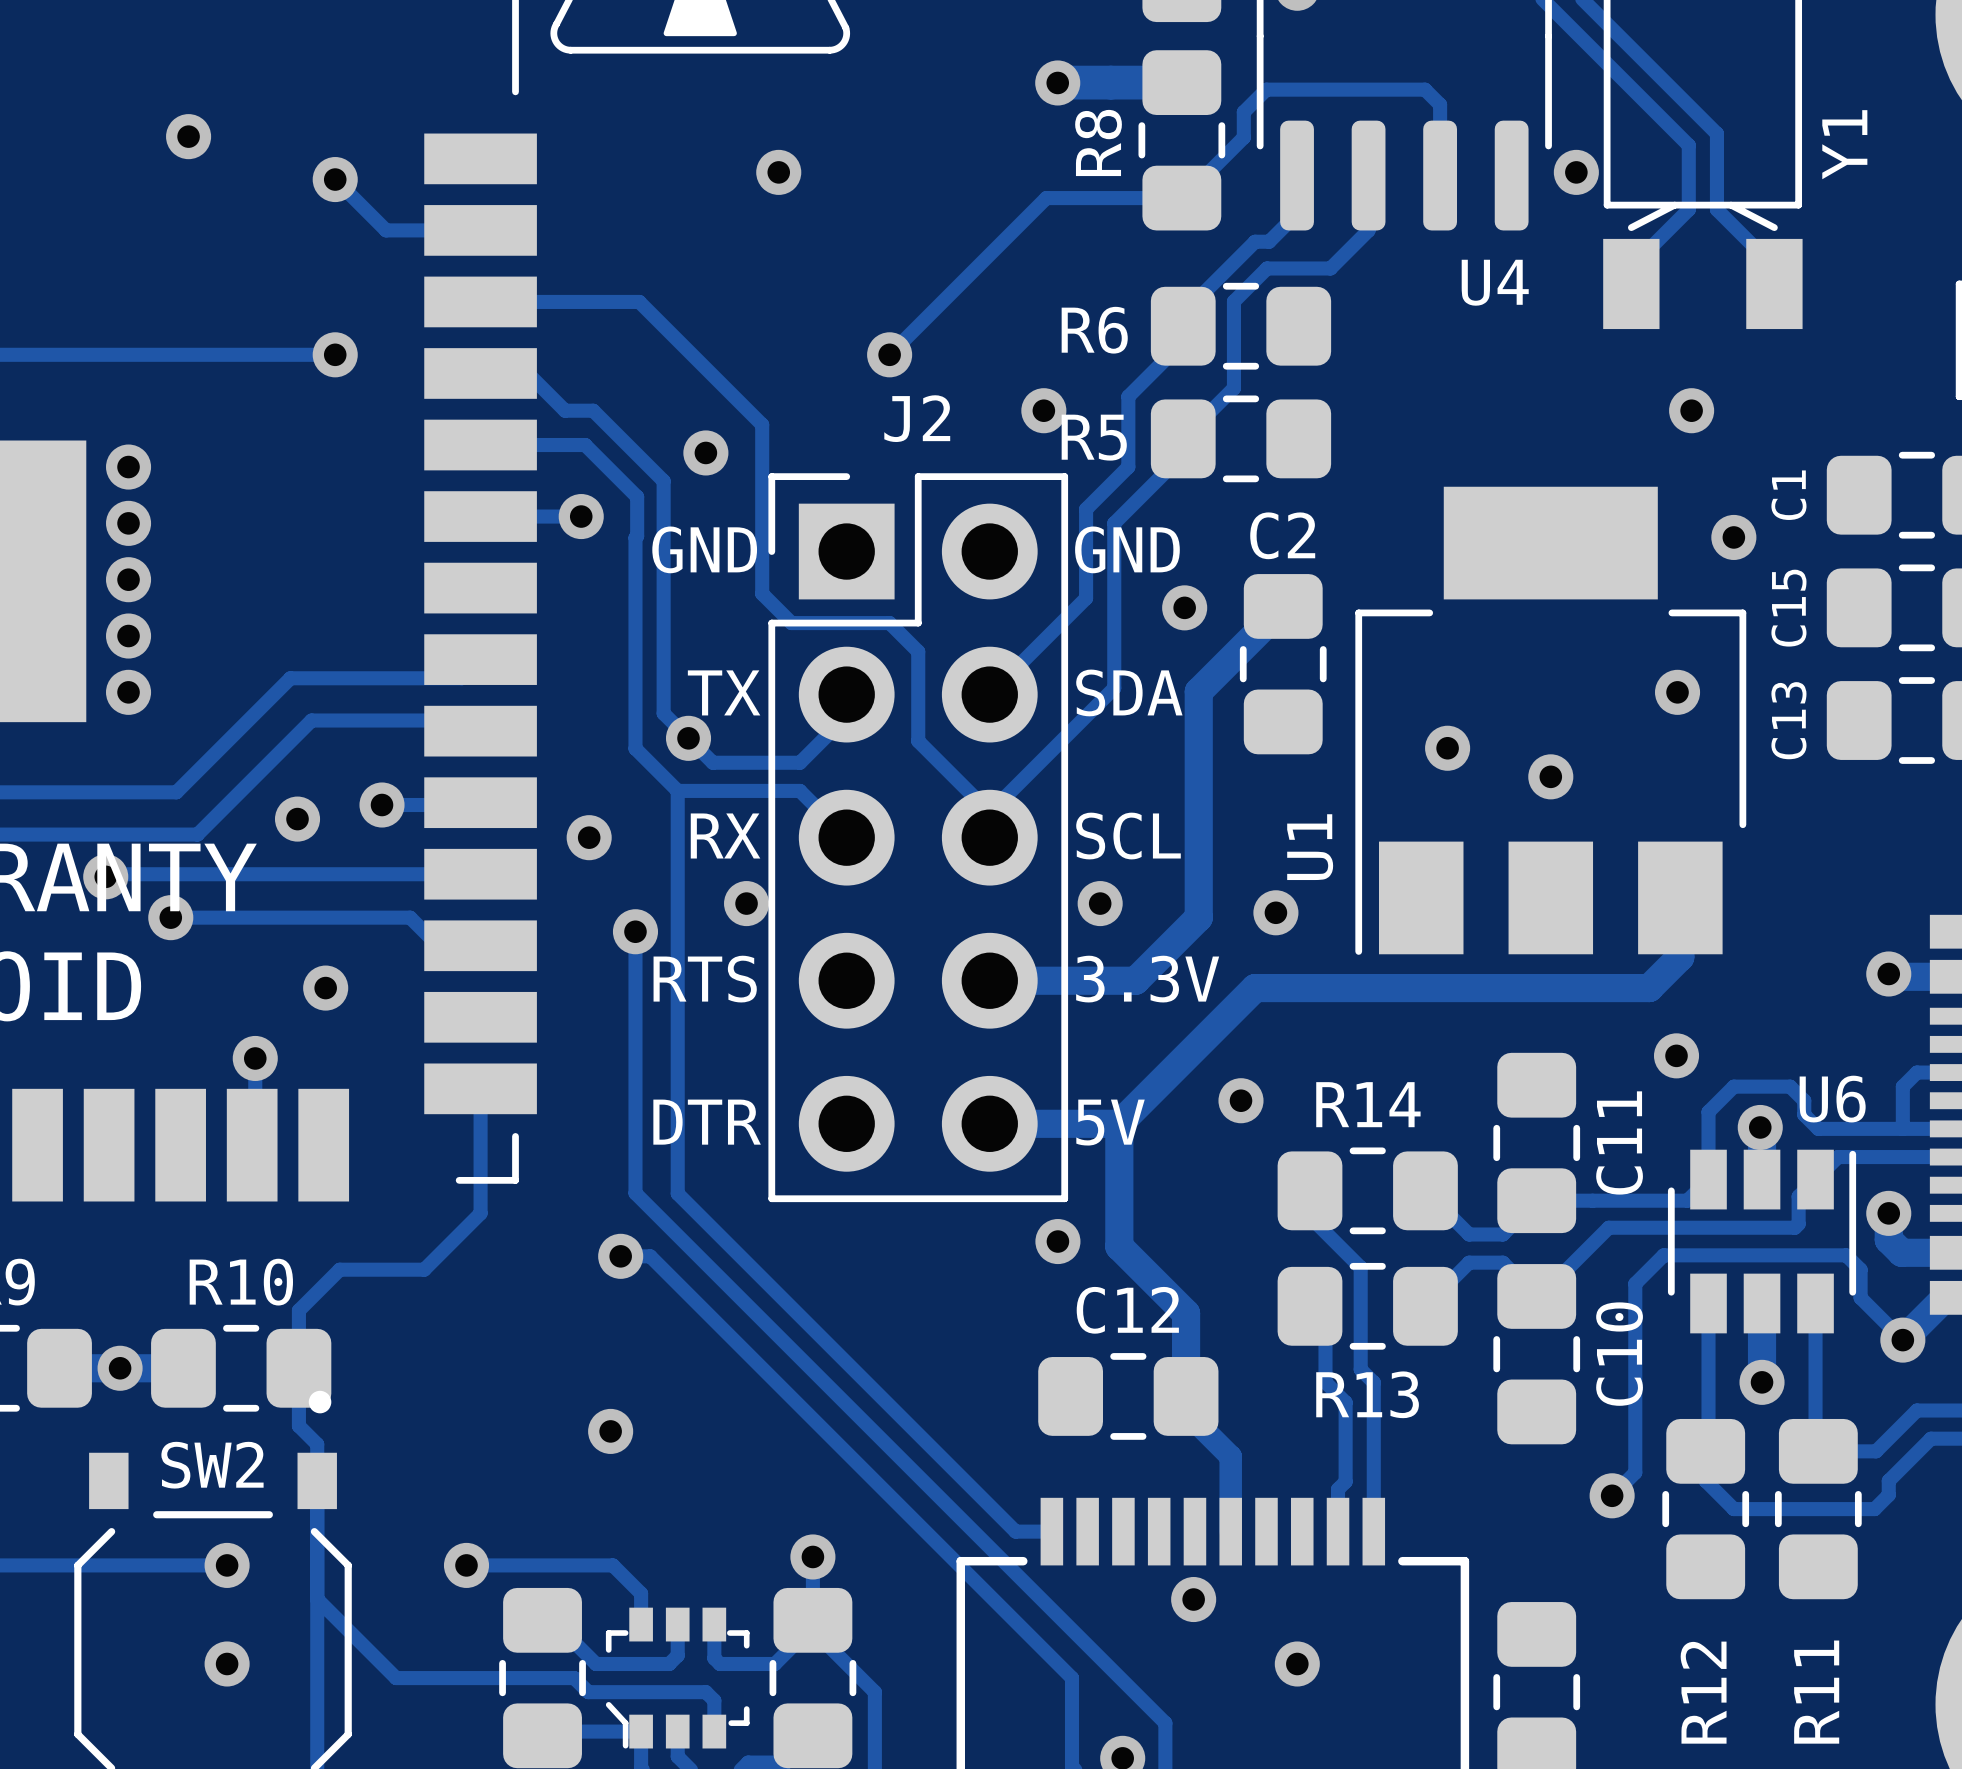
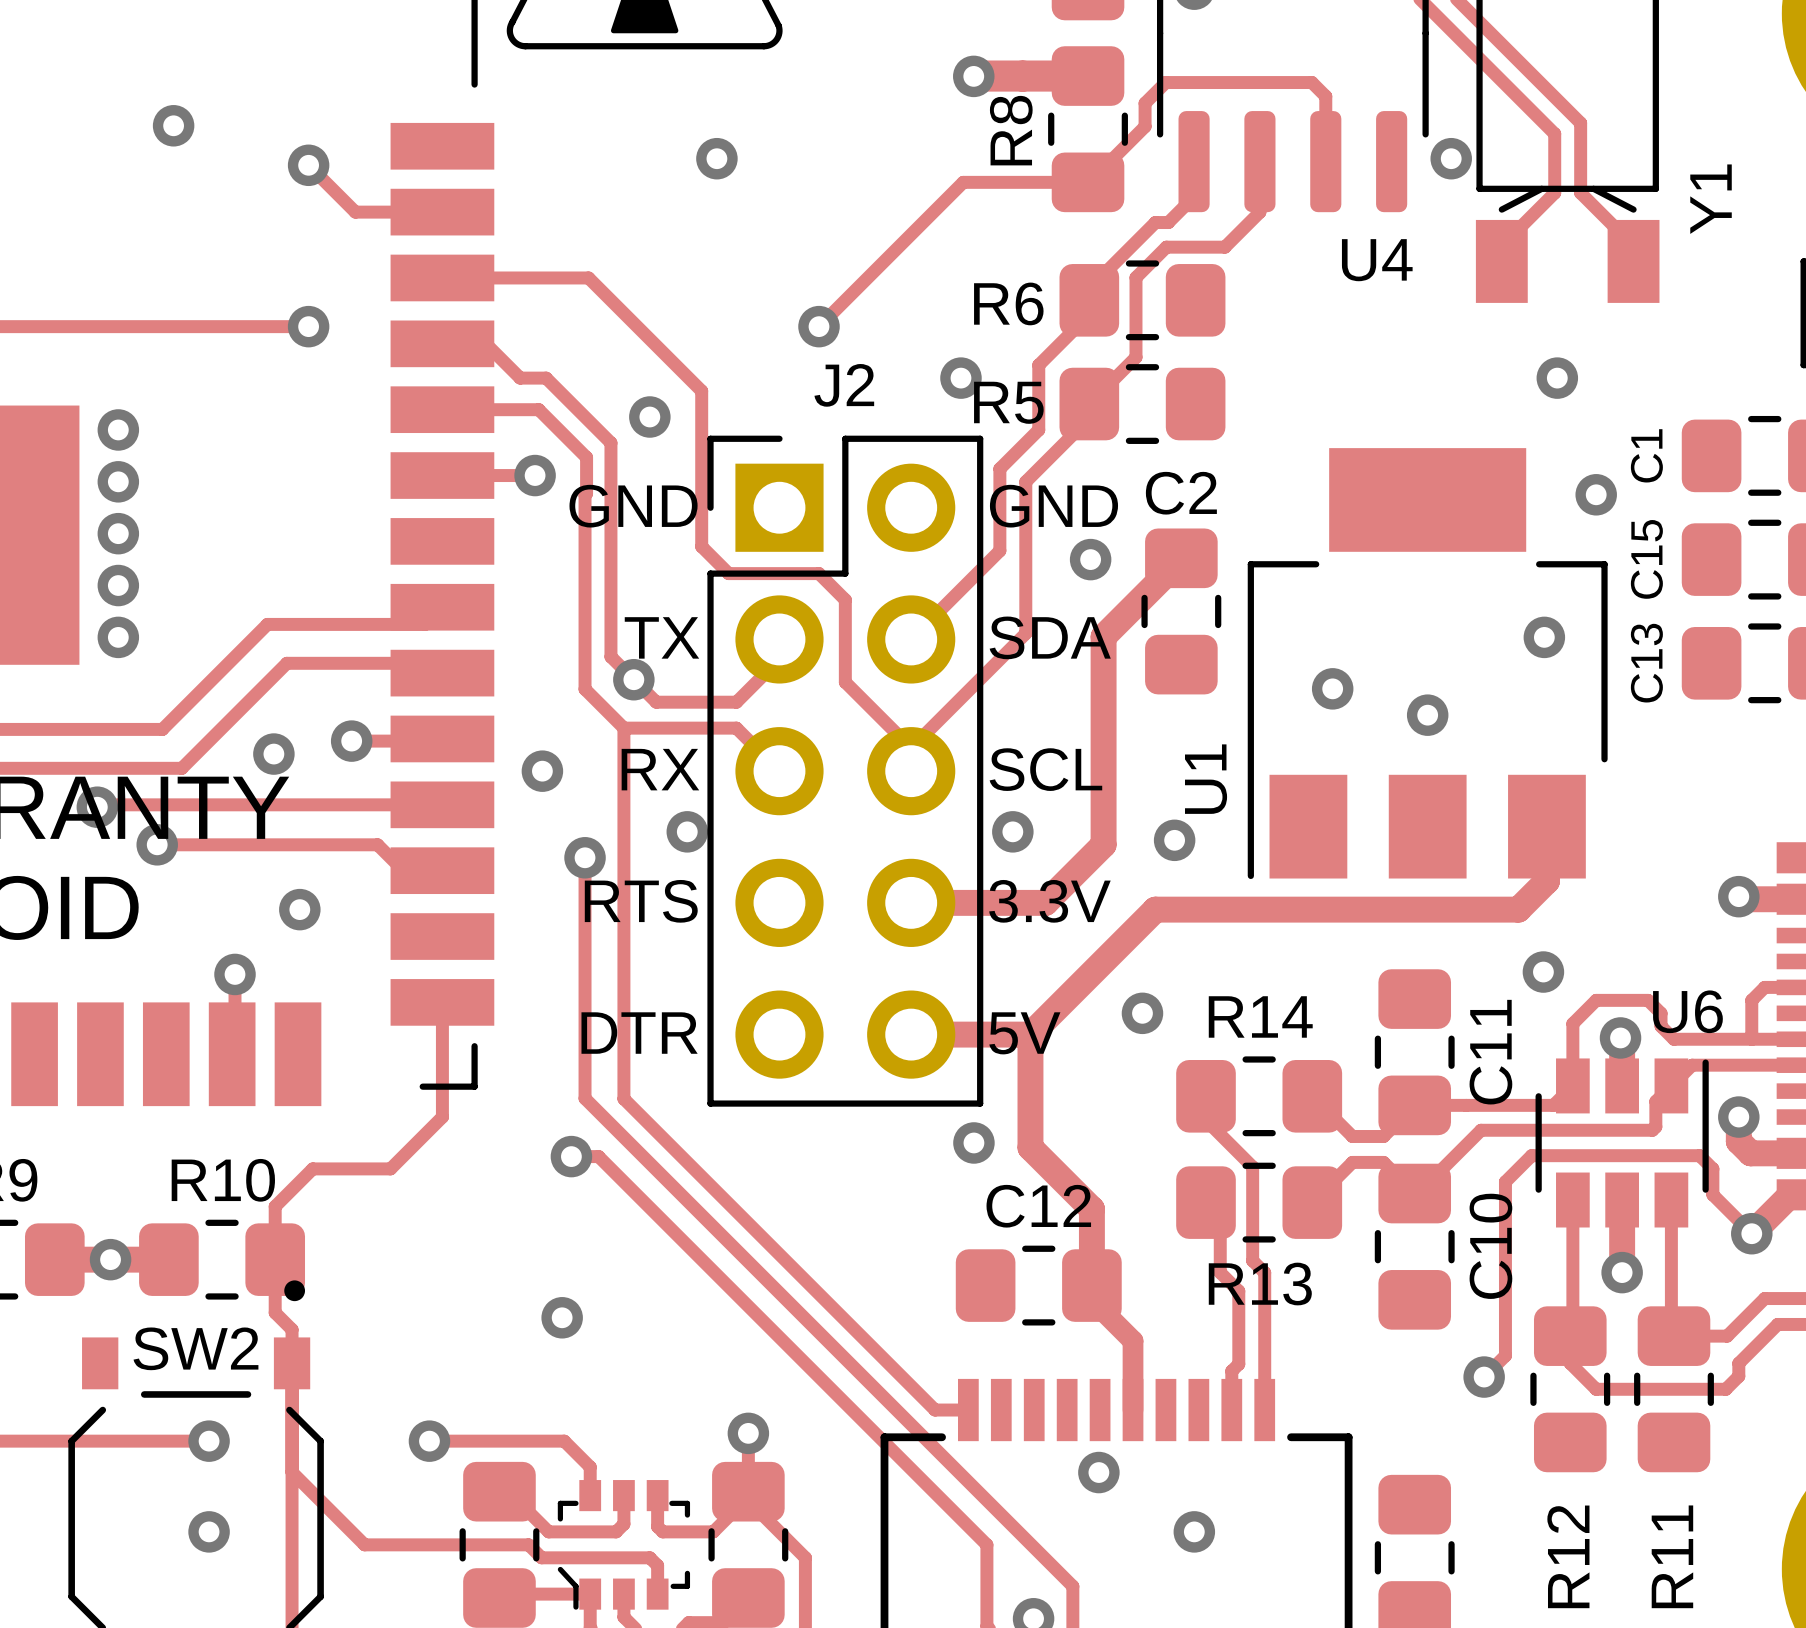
Y1 name position: Y1 (1844, 144) -> Y1 (1711, 199)

